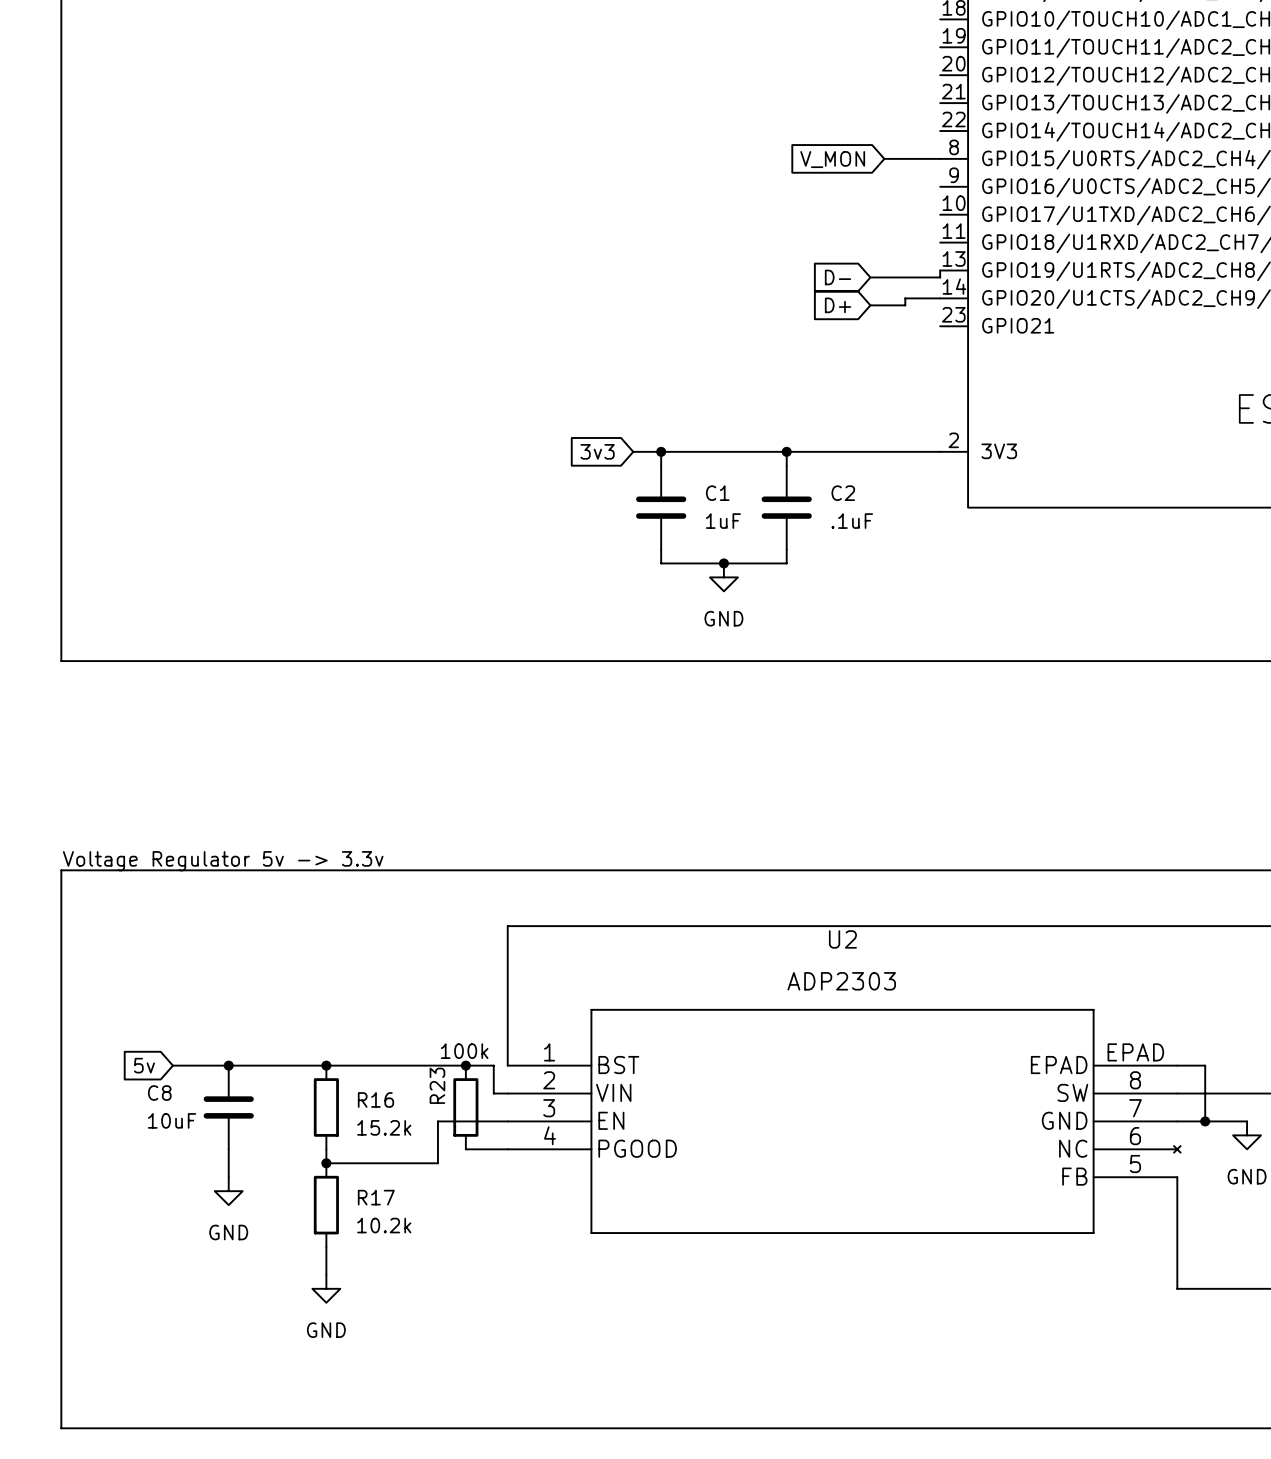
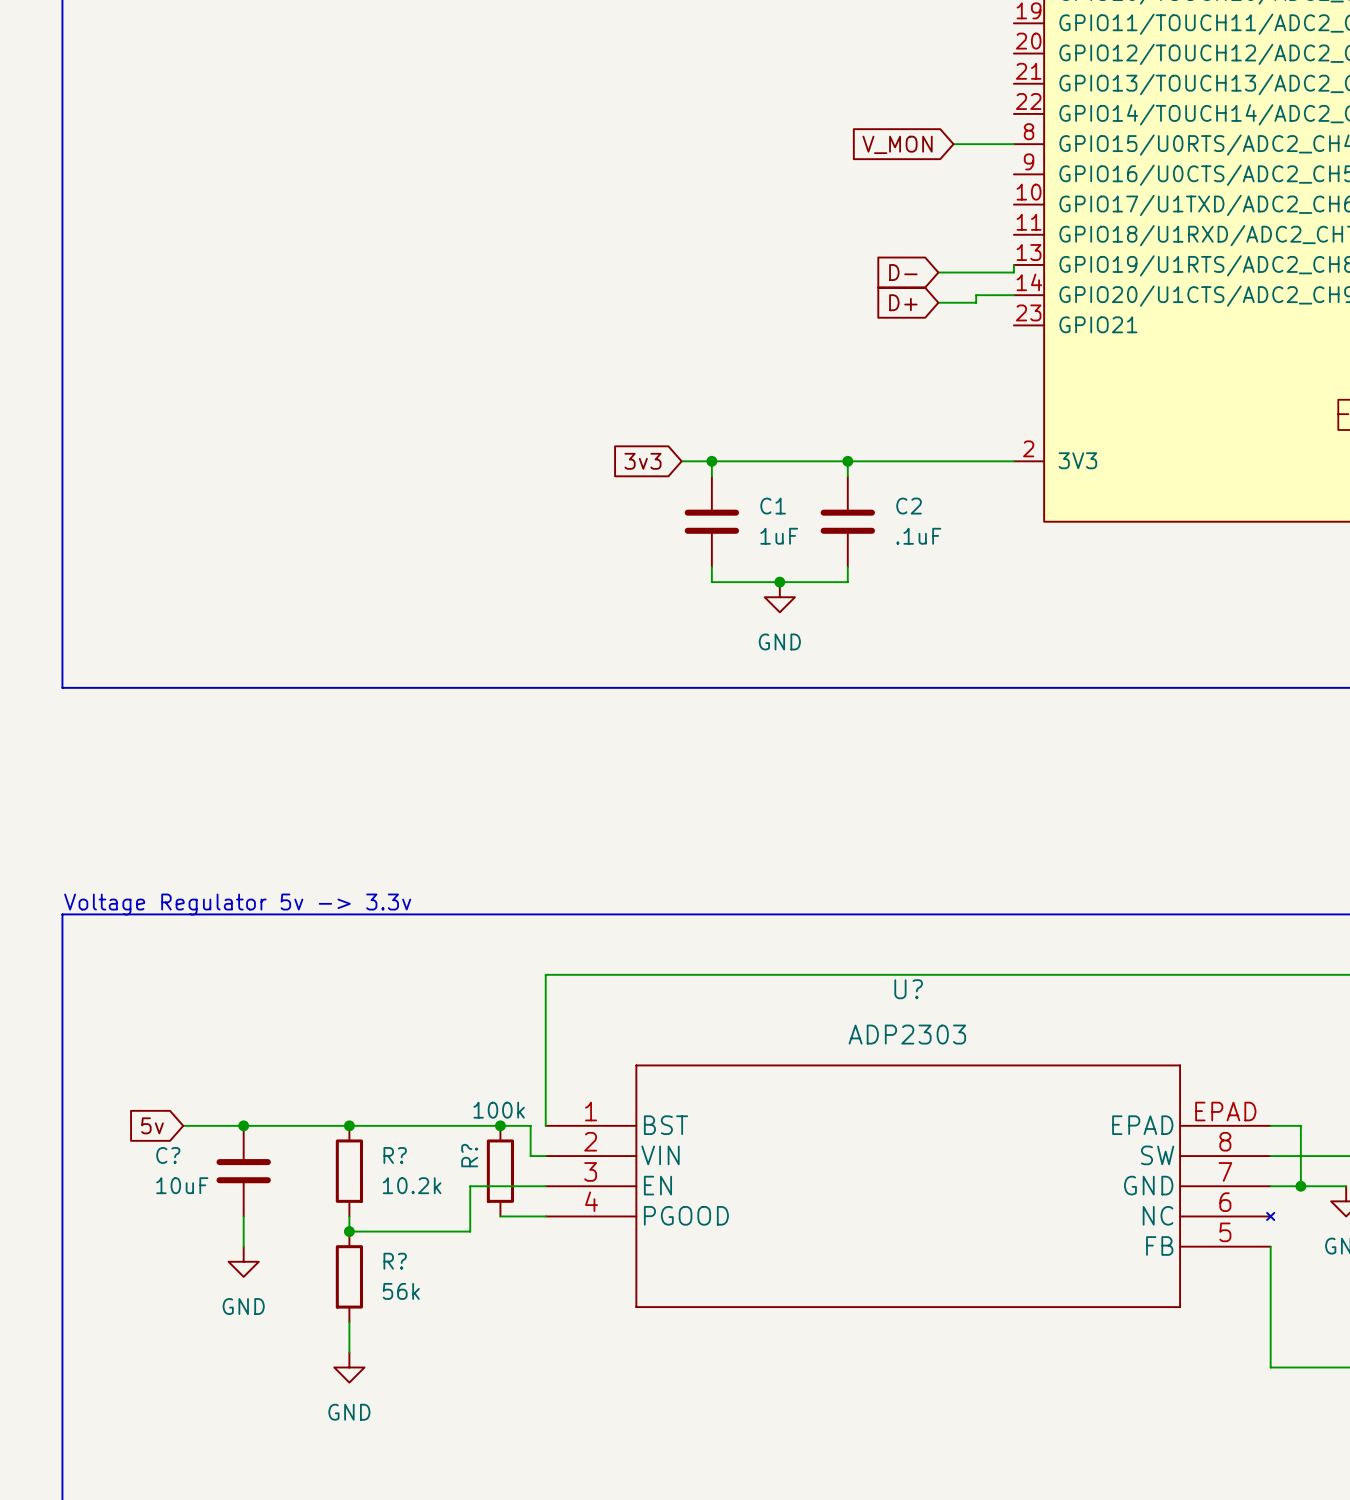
U2 name: U2 (842, 939) -> U? (908, 989)
R23 name: R23 (437, 1085) -> R? (469, 1155)
C8 name: C8 (159, 1093) -> C? (168, 1155)
R16 name: R16 (375, 1099) -> R? (395, 1155)
R16 value: 15.2k (384, 1127) -> 10.2k (412, 1185)
R17 name: R17 (376, 1197) -> R? (395, 1261)
R17 value: 10.2k (384, 1225) -> 56k (401, 1291)

